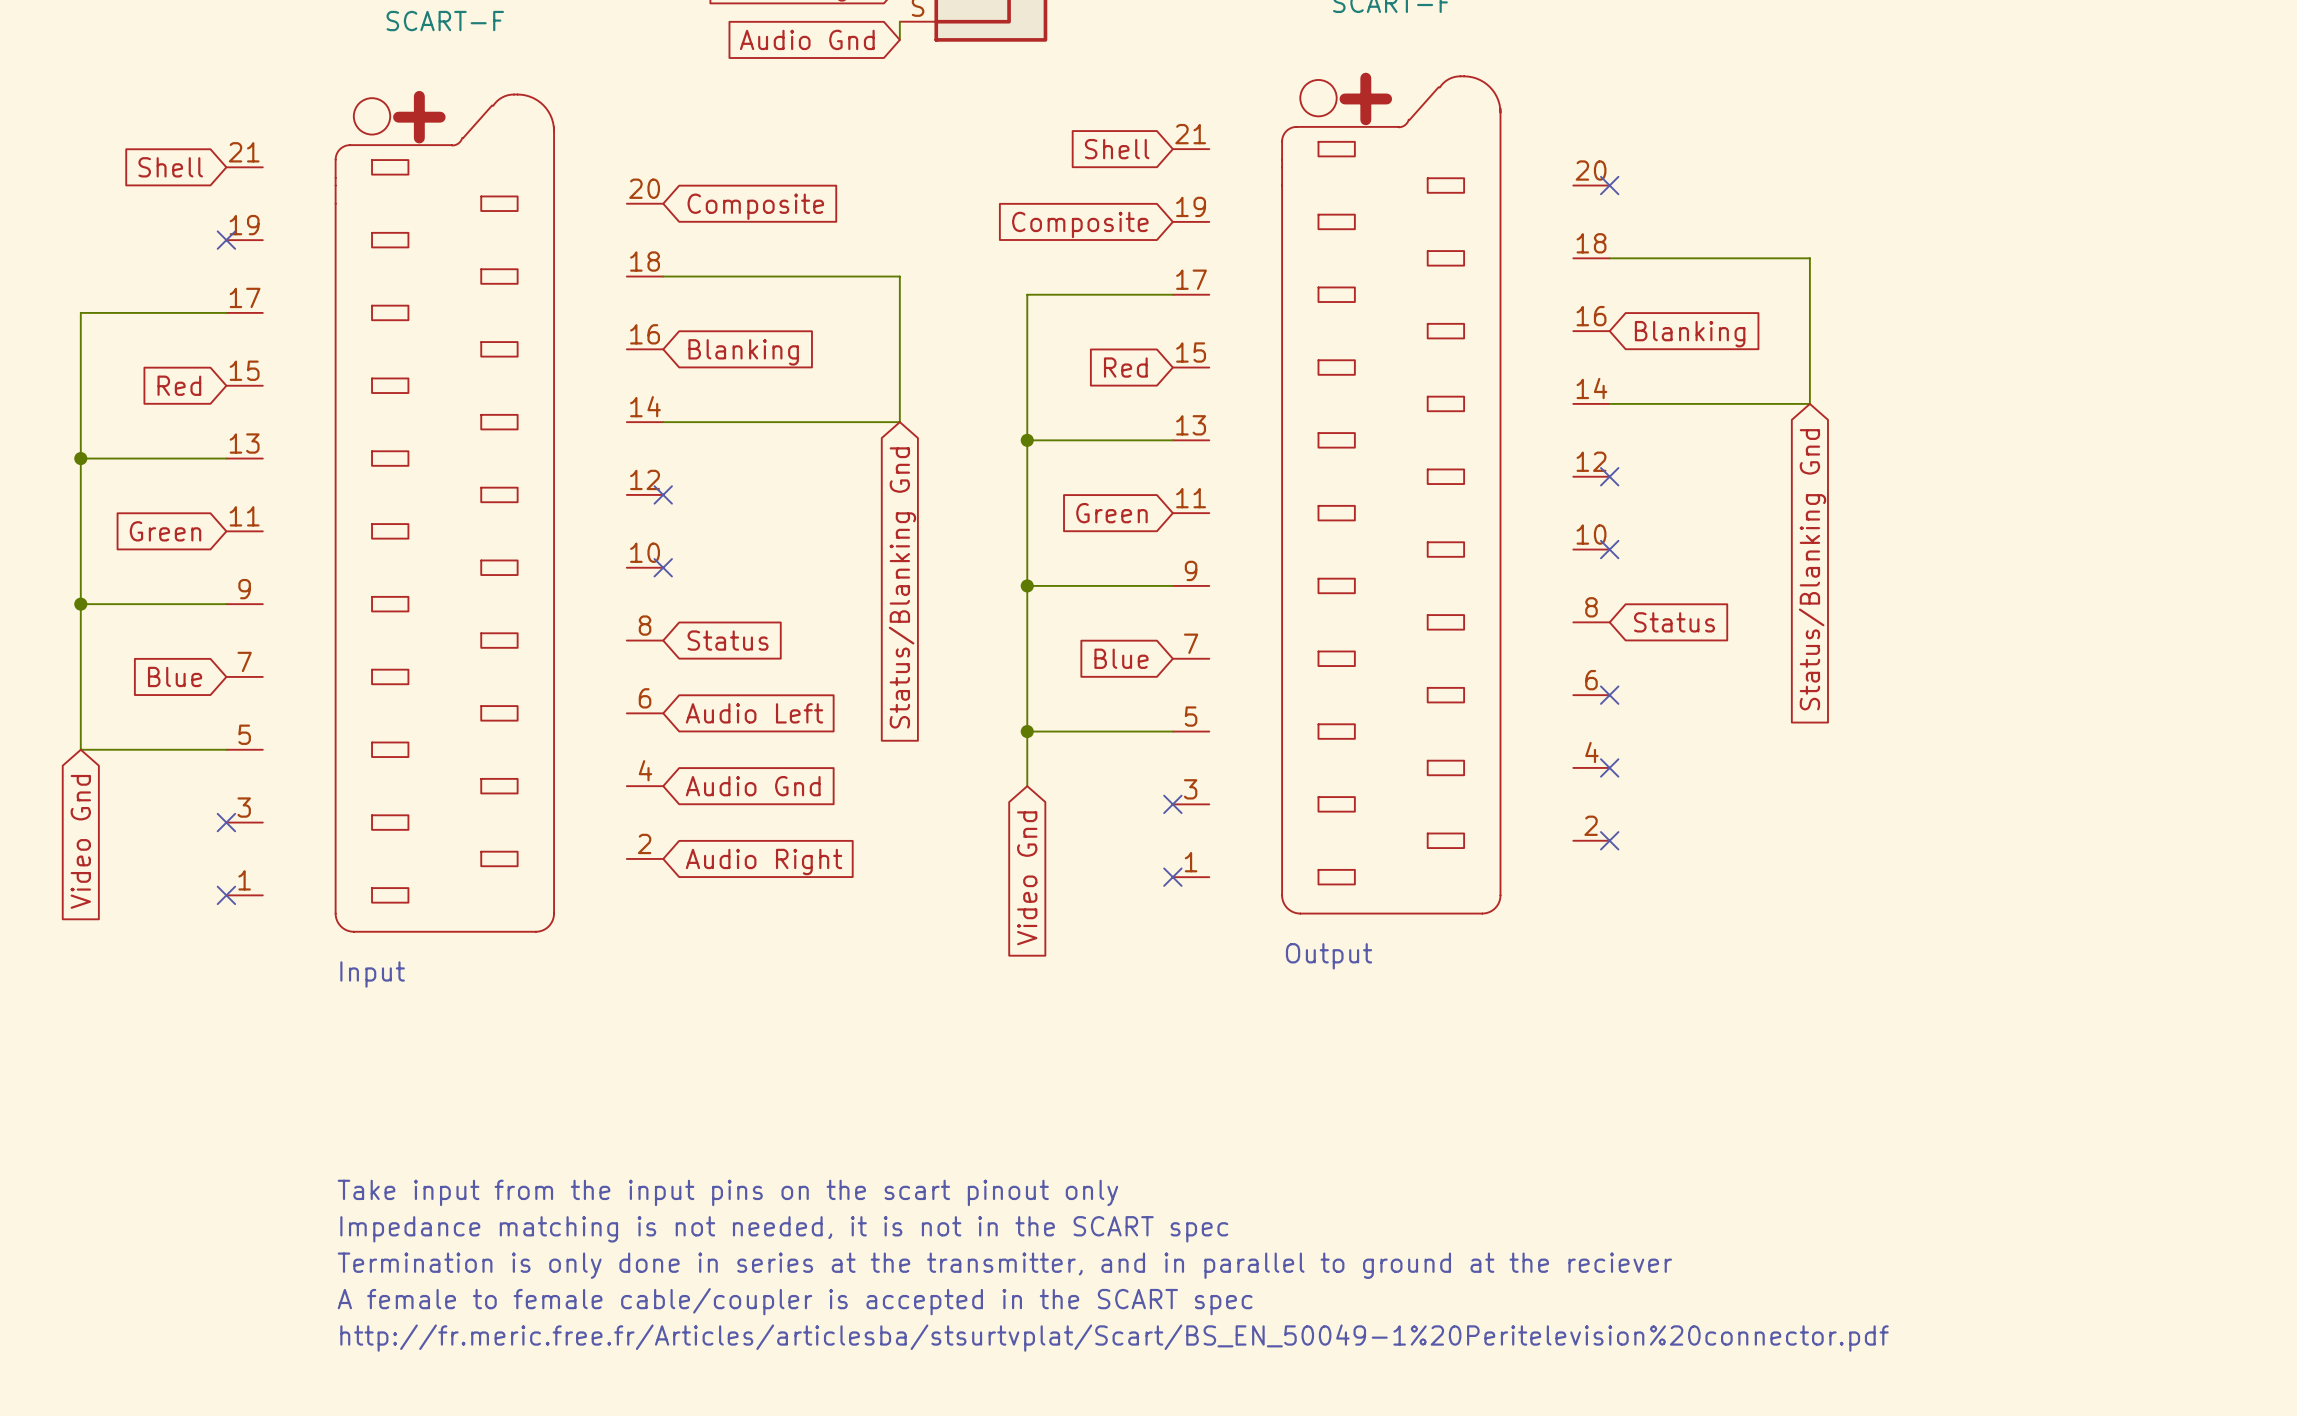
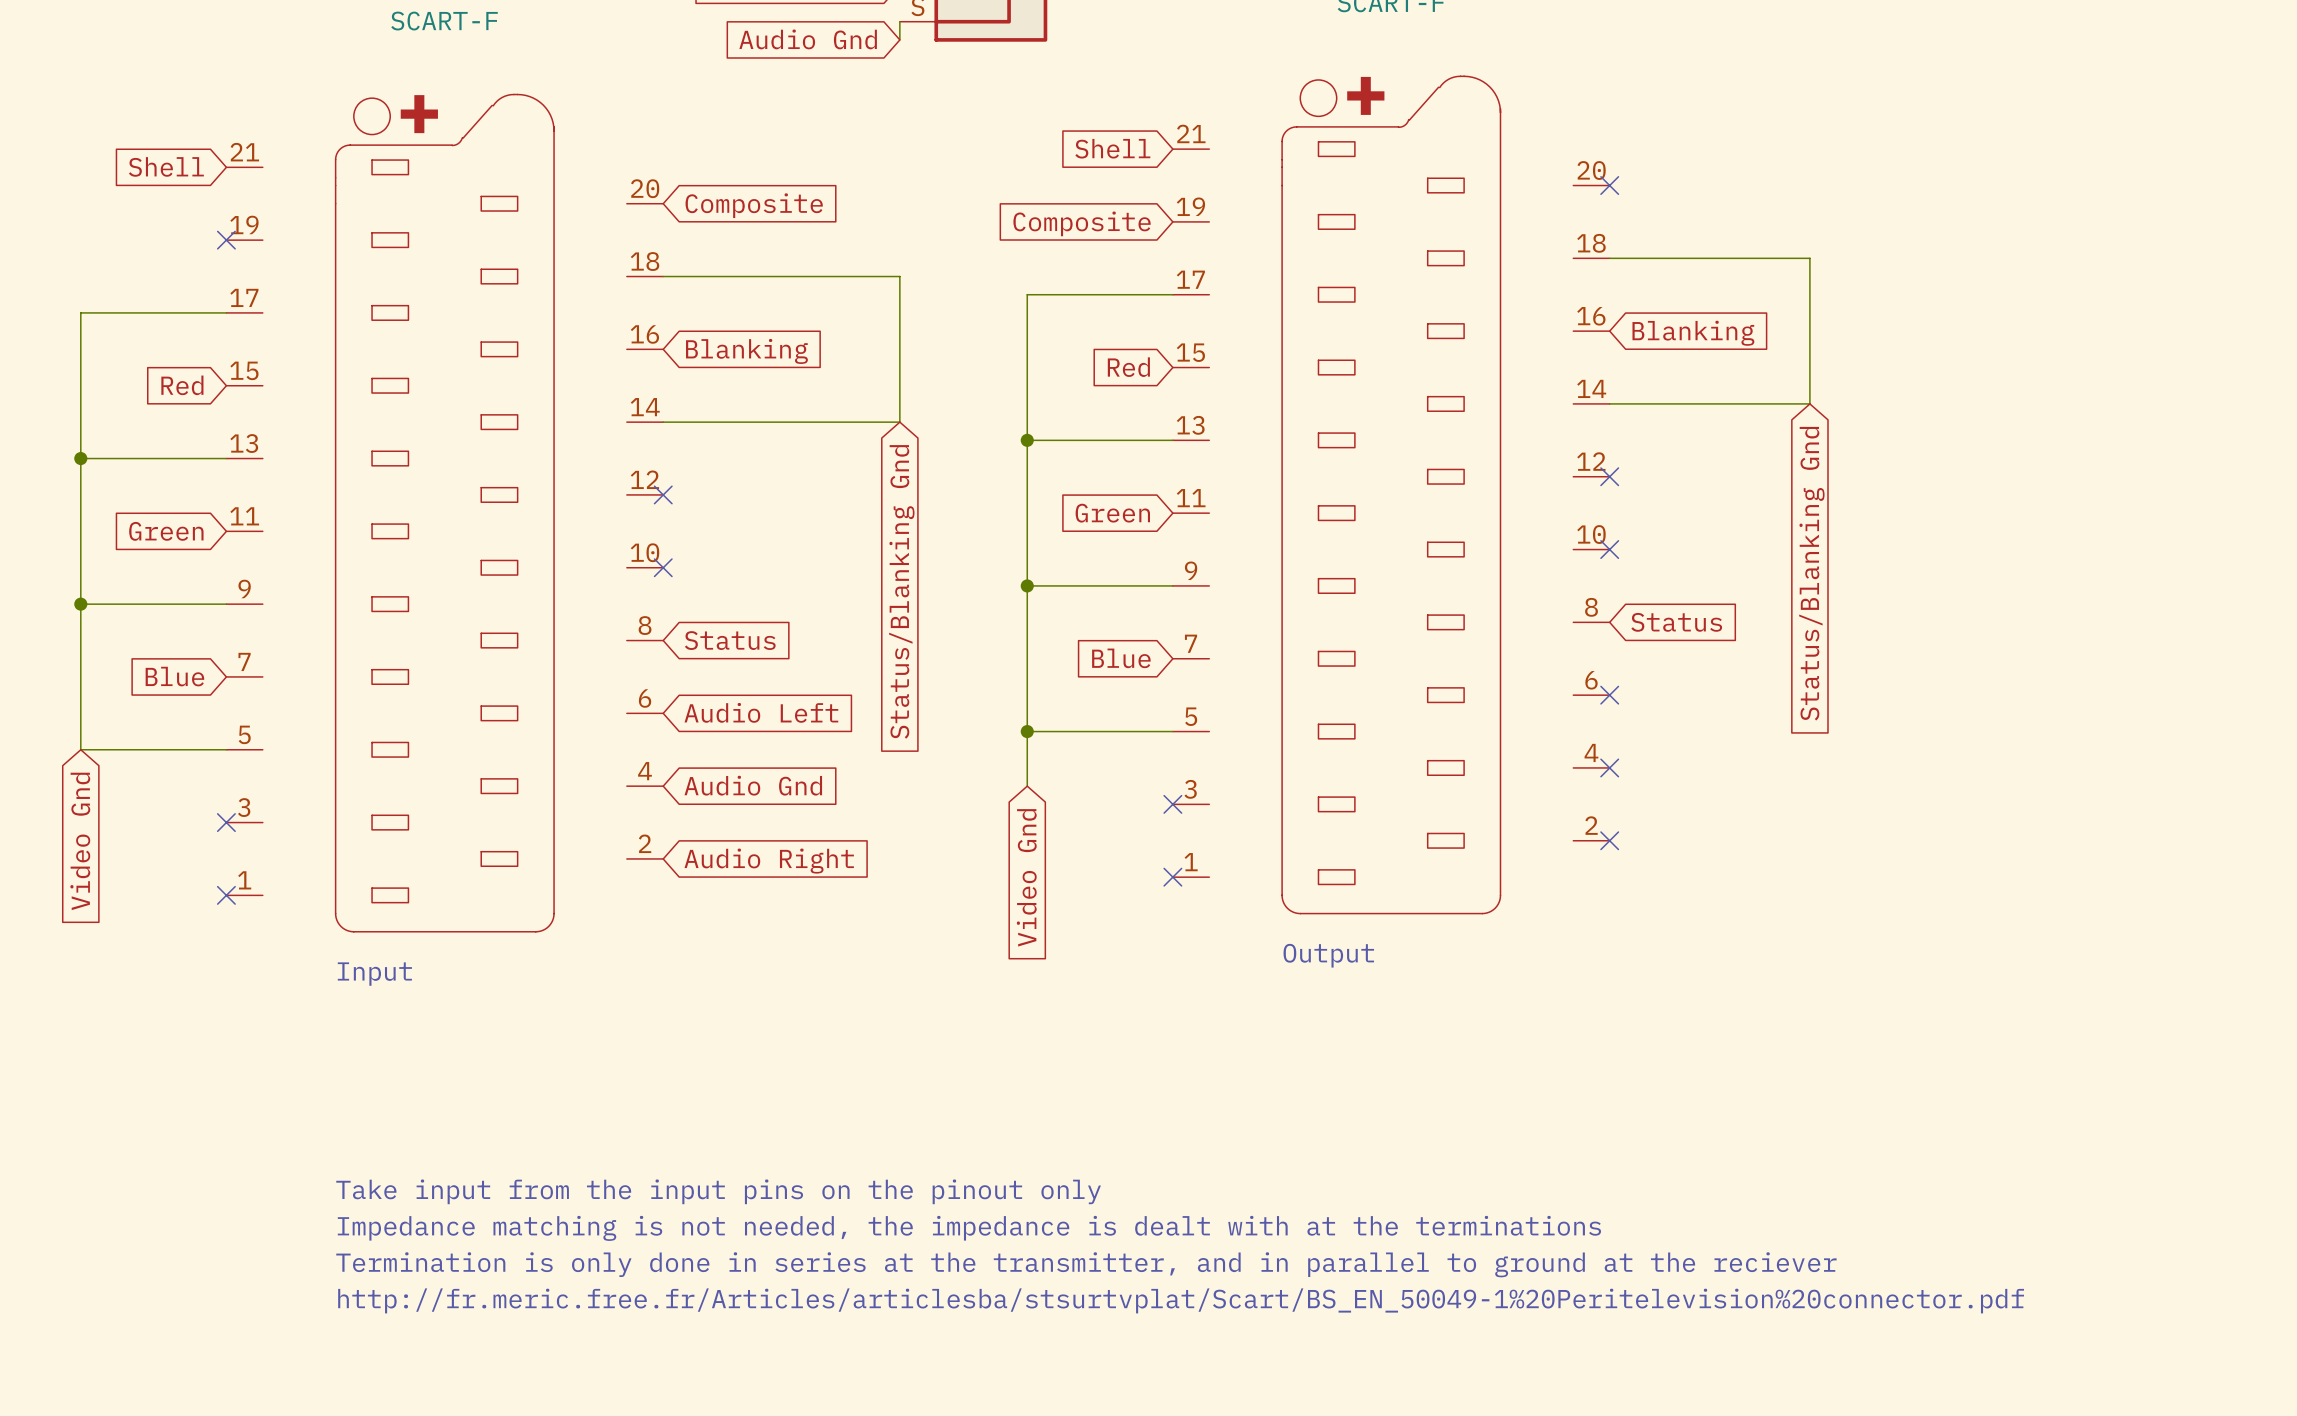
text: Take input from the input pins on the scart pinout only (727, 1192) -> Take input from the input pins on the pinout only (718, 1191)
text: Impedance matching is not needed, it is not in the SCART spec (784, 1229) -> Impedance matching is not needed, the impedance is dealt with at the terminations (969, 1228)
text: A female to female cable/coupler is accepted in the SCART spec (795, 1301) -> http://fr.meric.free.fr/Articles/articlesba/stsurtvplat/Scart/BS_EN_50049-1%20Peritelevision%20connector.pdf (1181, 1300)
text: http://fr.meric.free.fr/Articles/articlesba/stsurtvplat/Scart/BS_EN_50049-1%20Peritelevision%20connector.pdf (1114, 1338) -> none

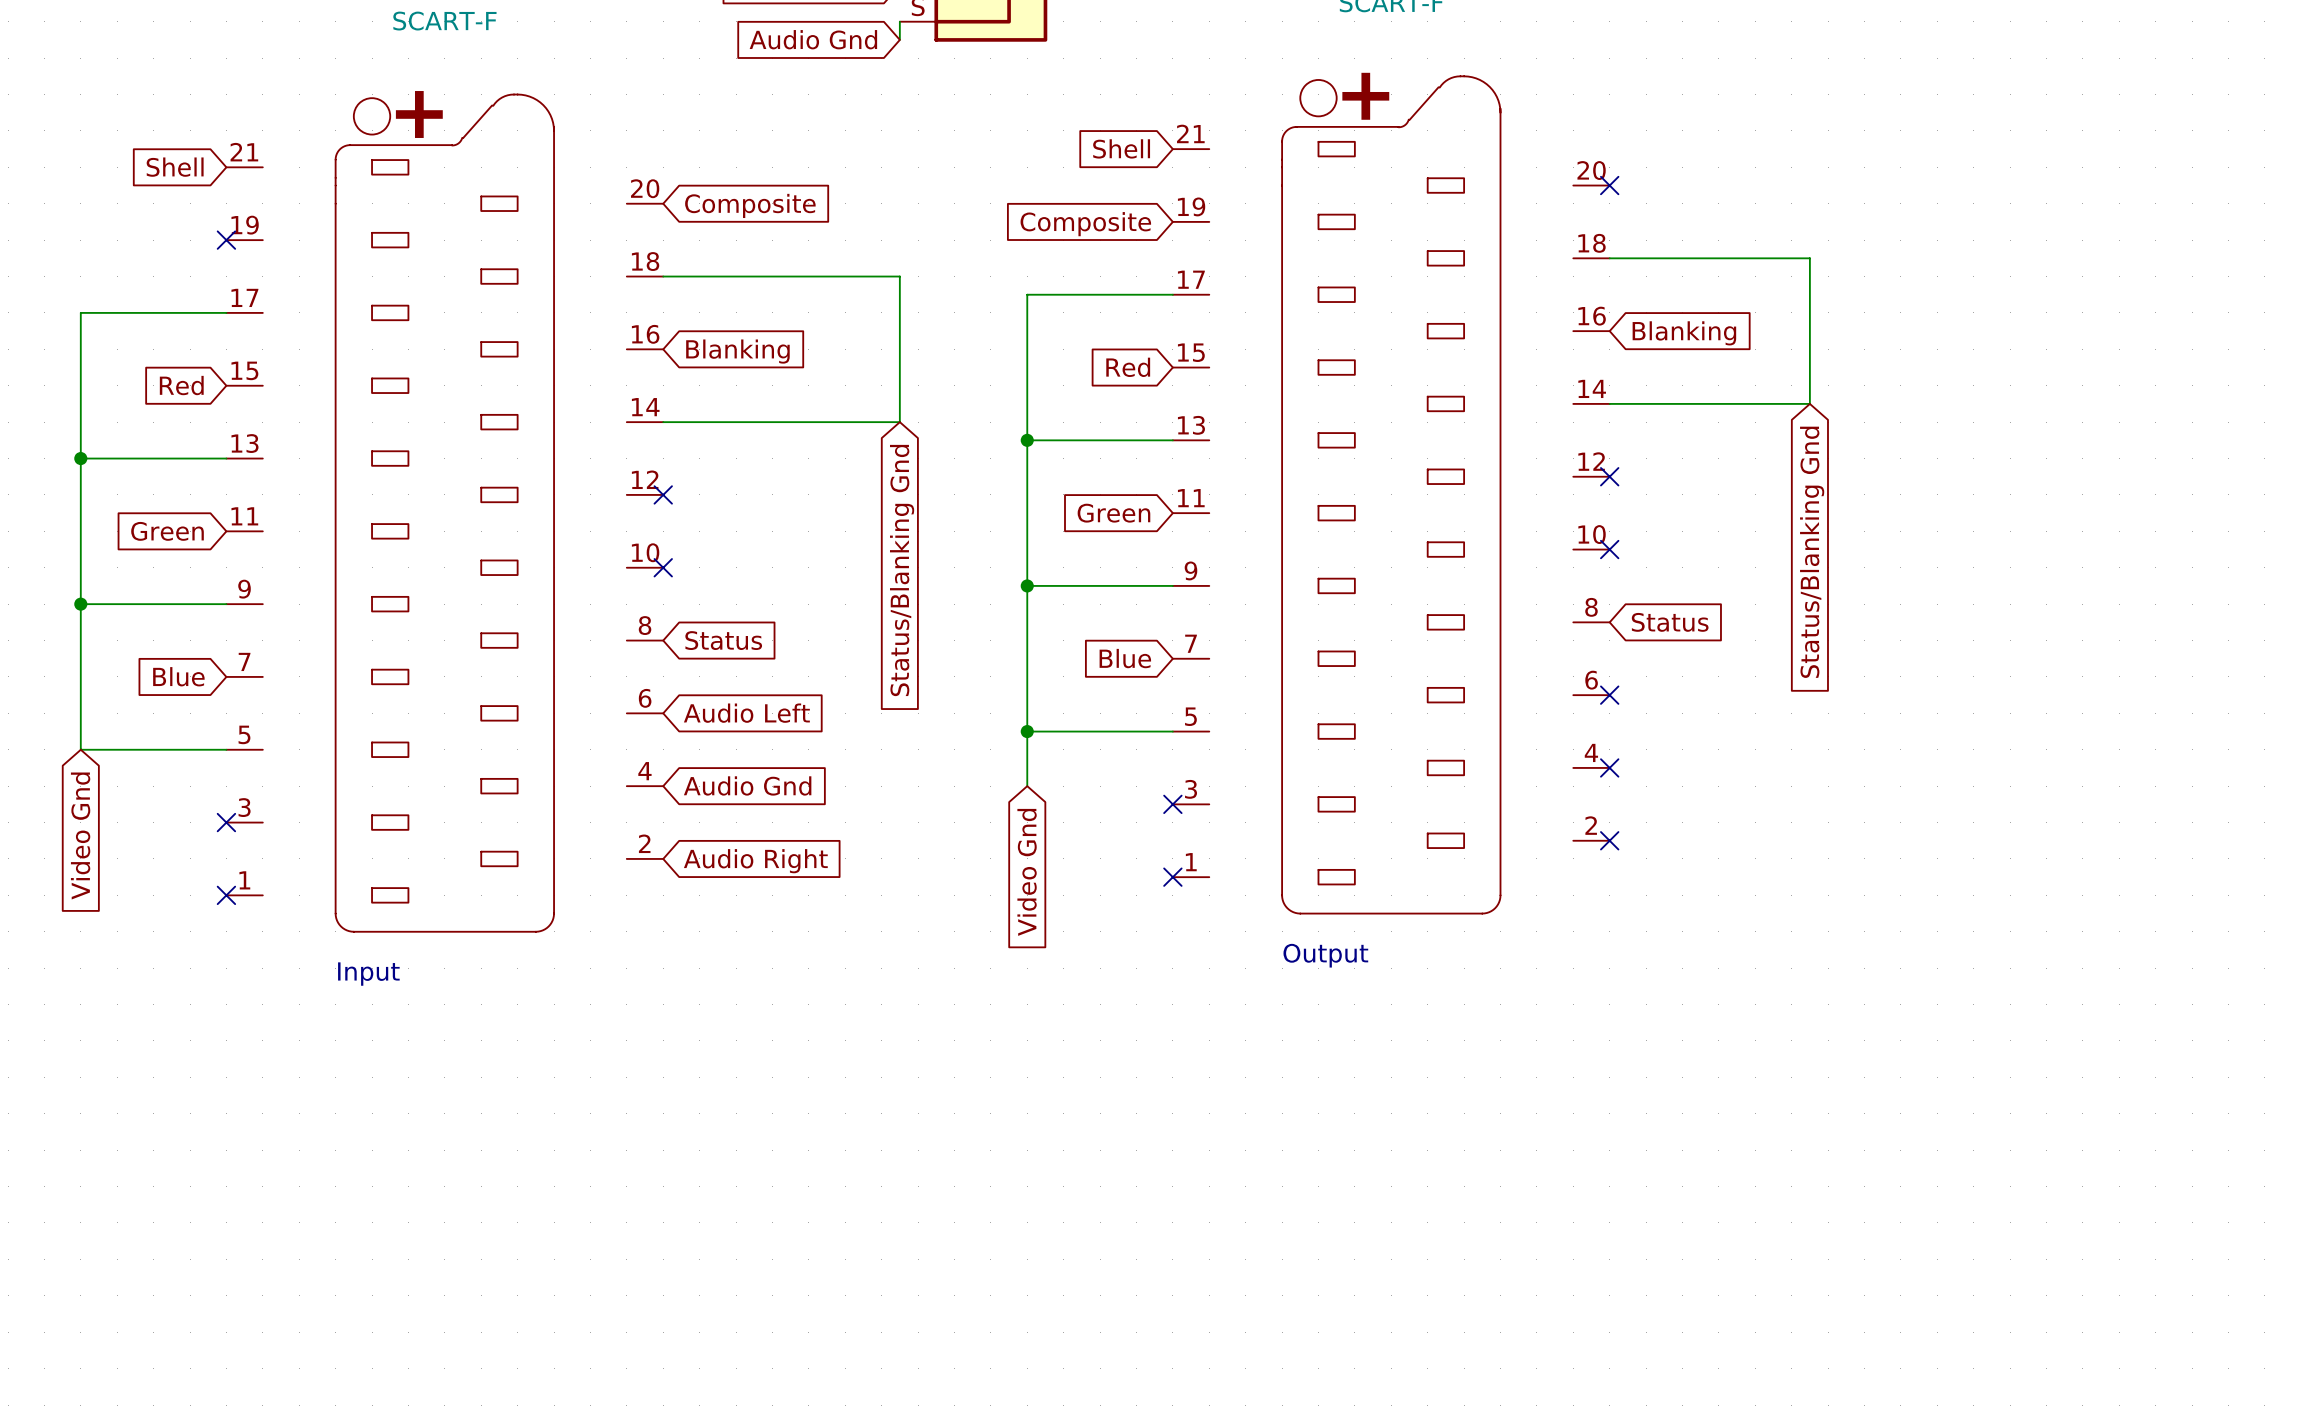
text: Take input from the input pins on the pinout only (718, 1191) -> none
text: Impedance matching is not needed, the impedance is dealt with at the terminations (969, 1228) -> none
text: Termination is only done in series at the transmitter, and in parallel to ground at the reciever (1086, 1264) -> none
text: http://fr.meric.free.fr/Articles/articlesba/stsurtvplat/Scart/BS_EN_50049-1%20Peritelevision%20connector.pdf (1181, 1300) -> none

